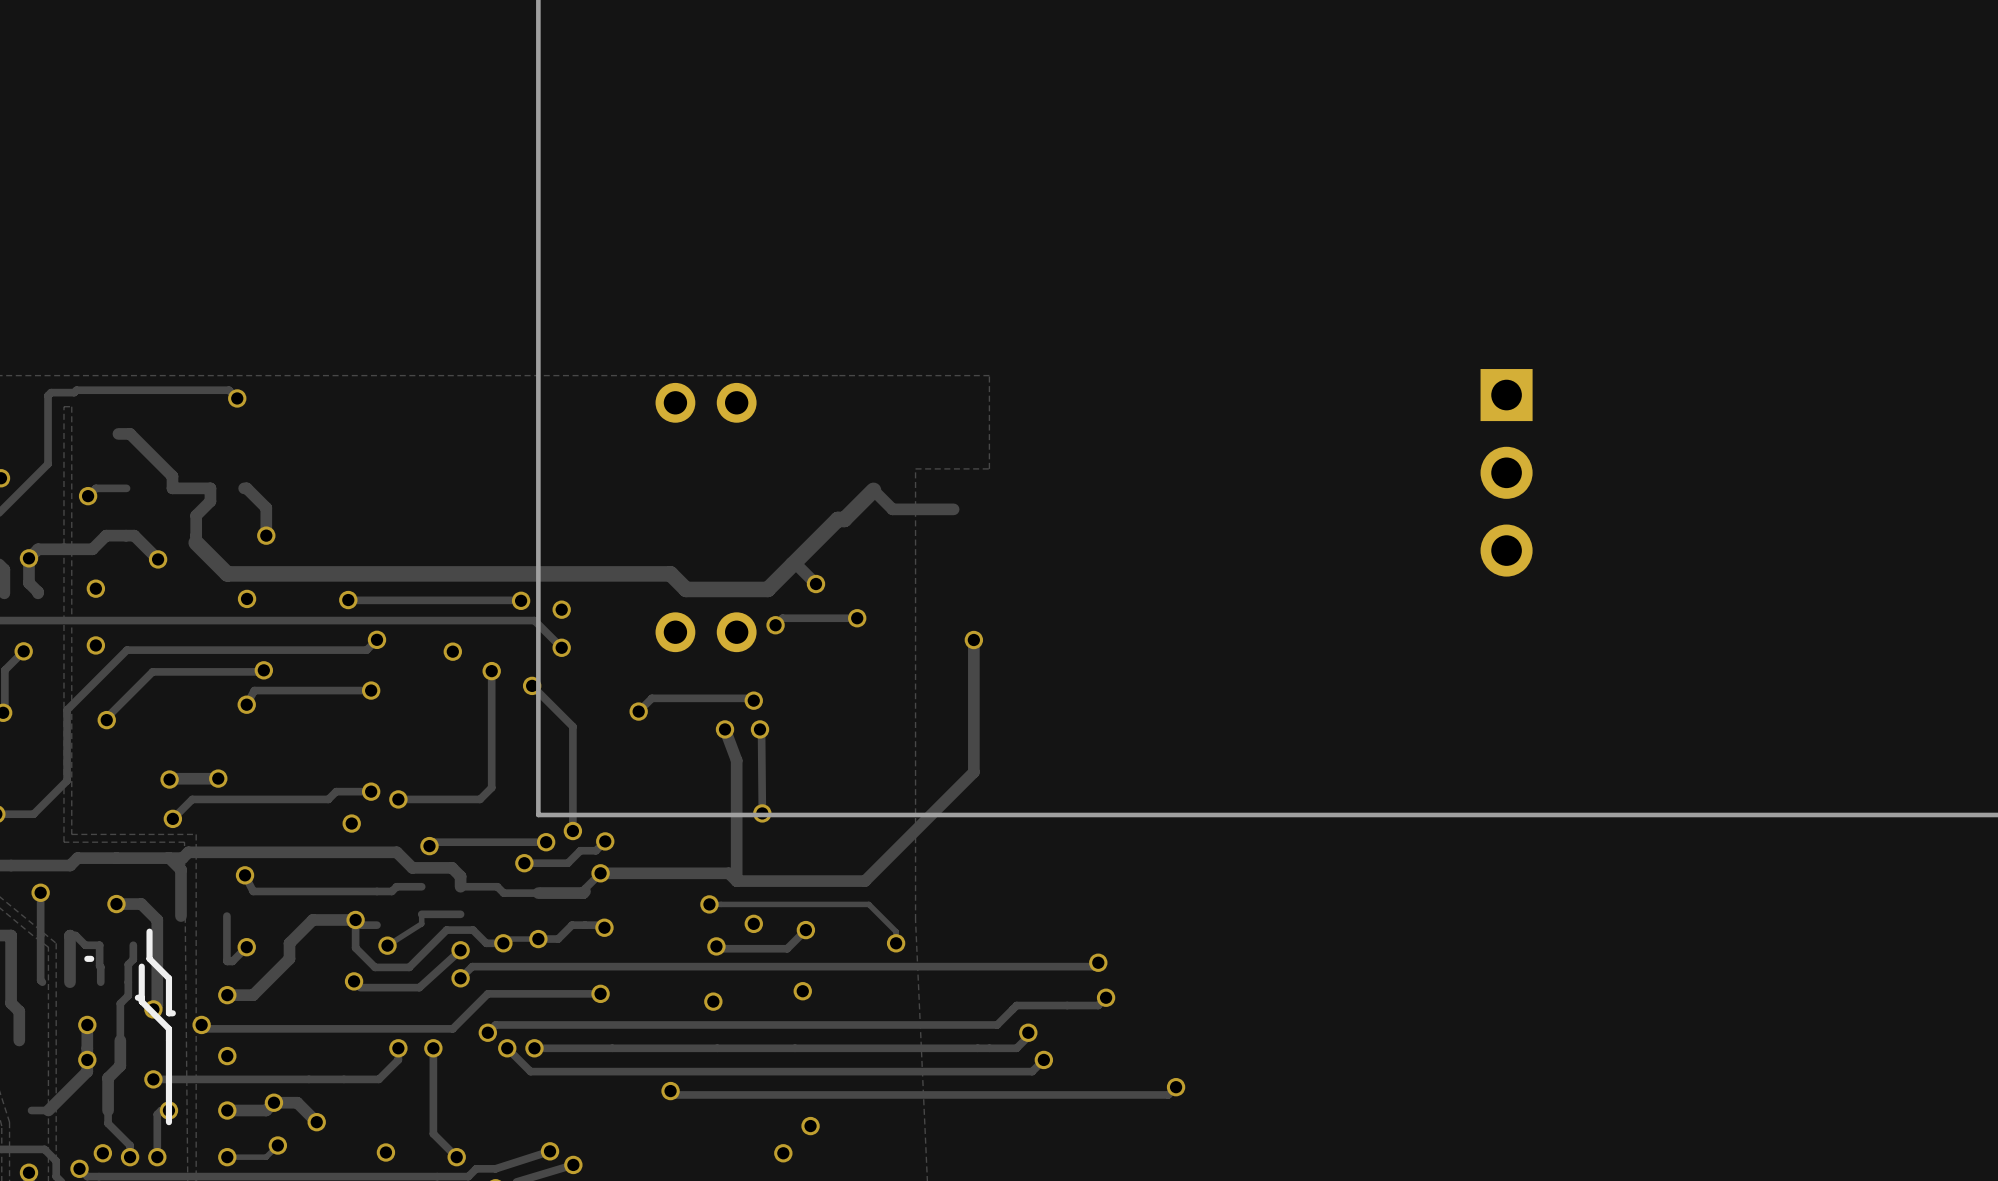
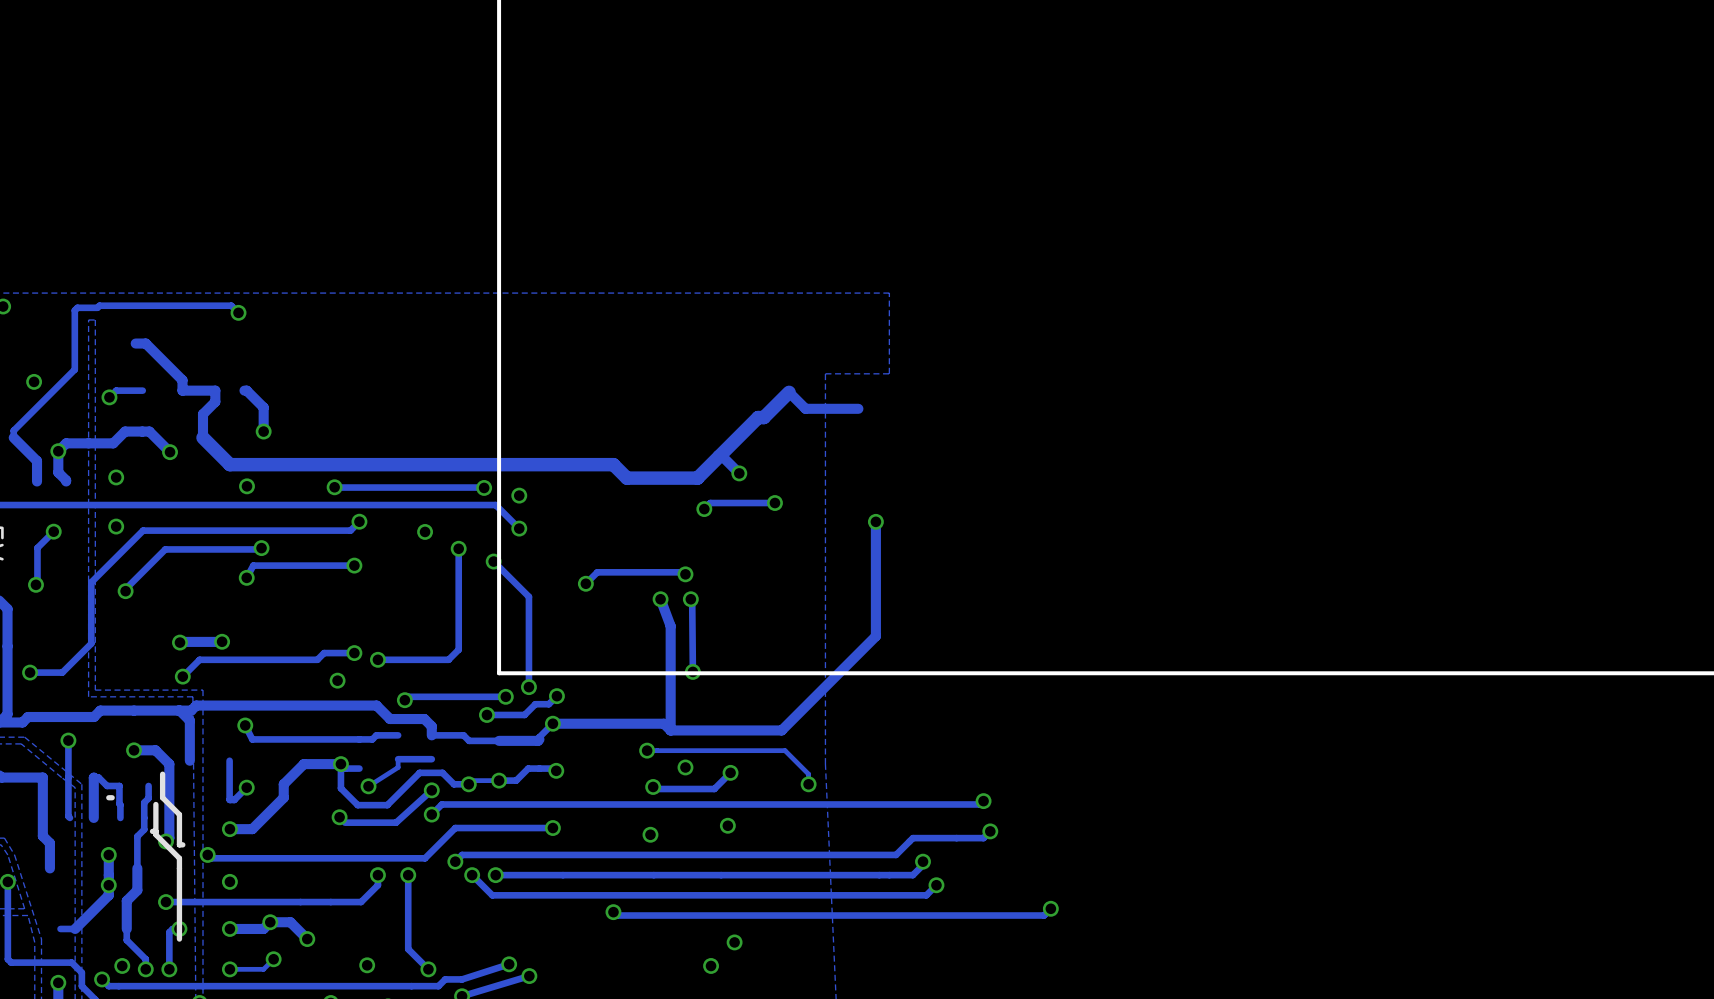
part: (706, 402) -> none
part: (1506, 472) -> none
part: (706, 632) -> none

